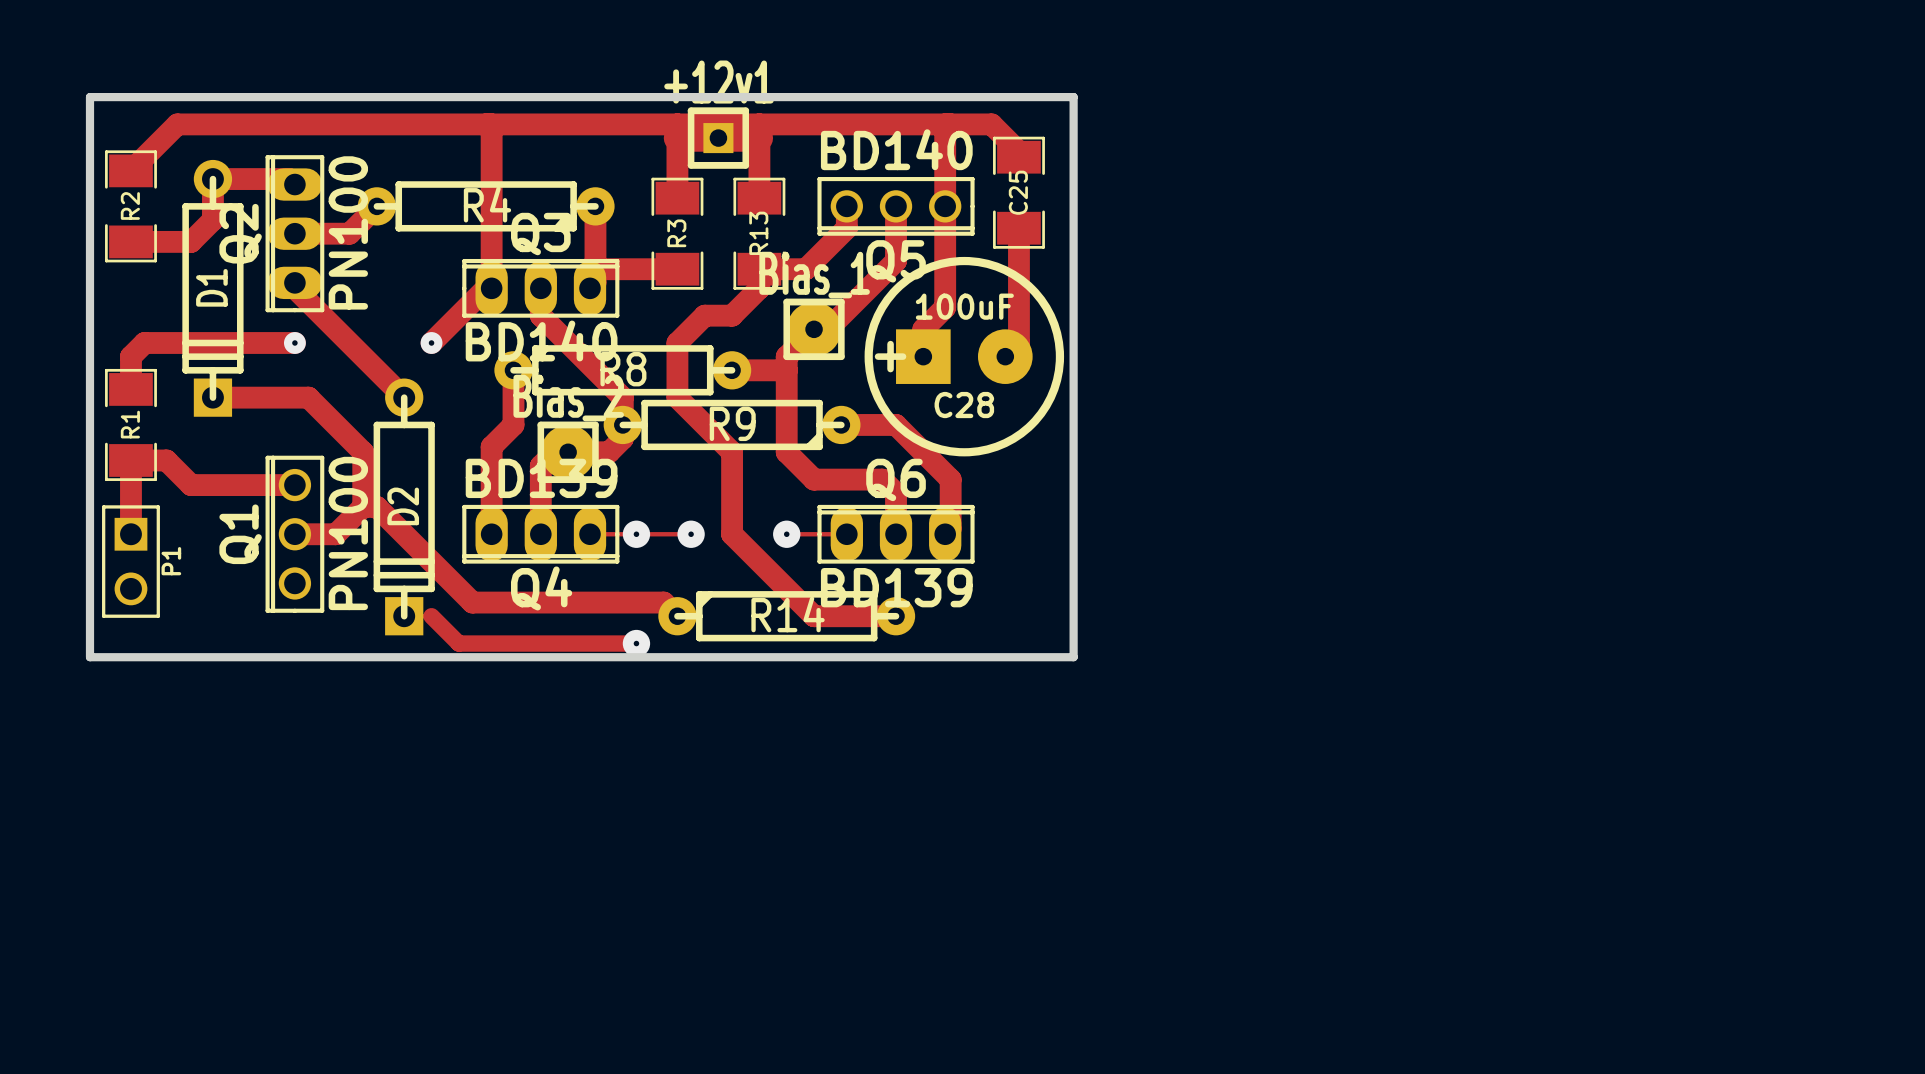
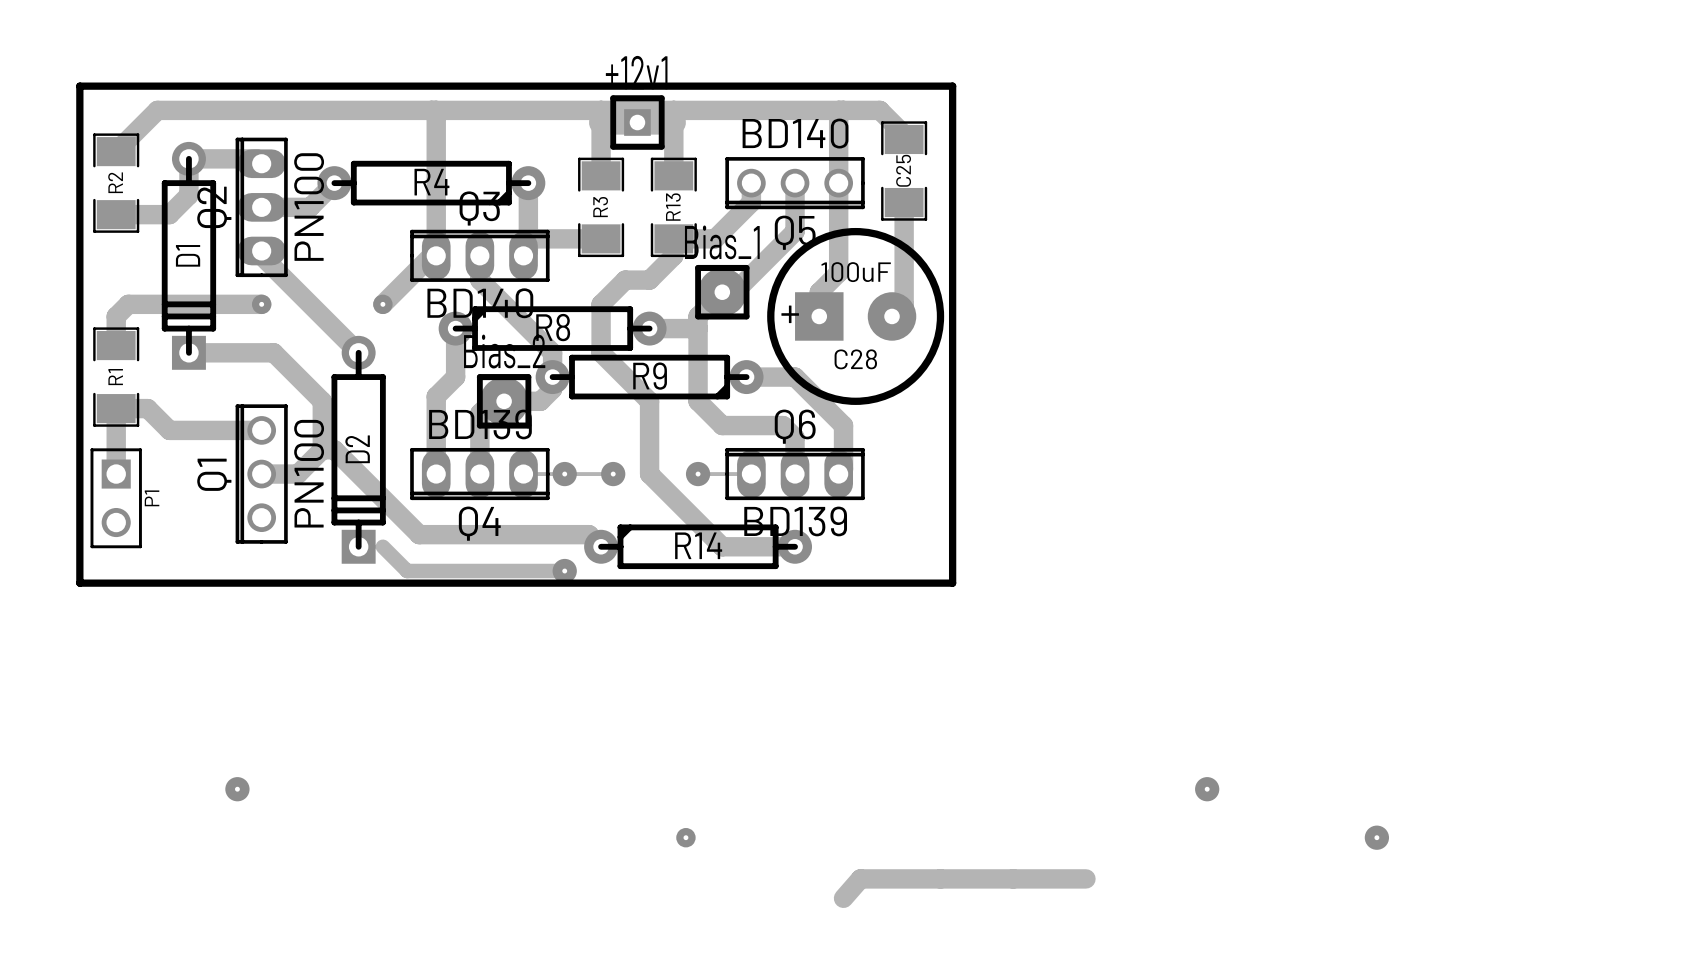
via: none -> (237, 789)
via: none -> (1207, 789)
via: none -> (685, 837)
via: none -> (1376, 837)
track: none -> (1085, 878) (860, 878) (843, 898)

